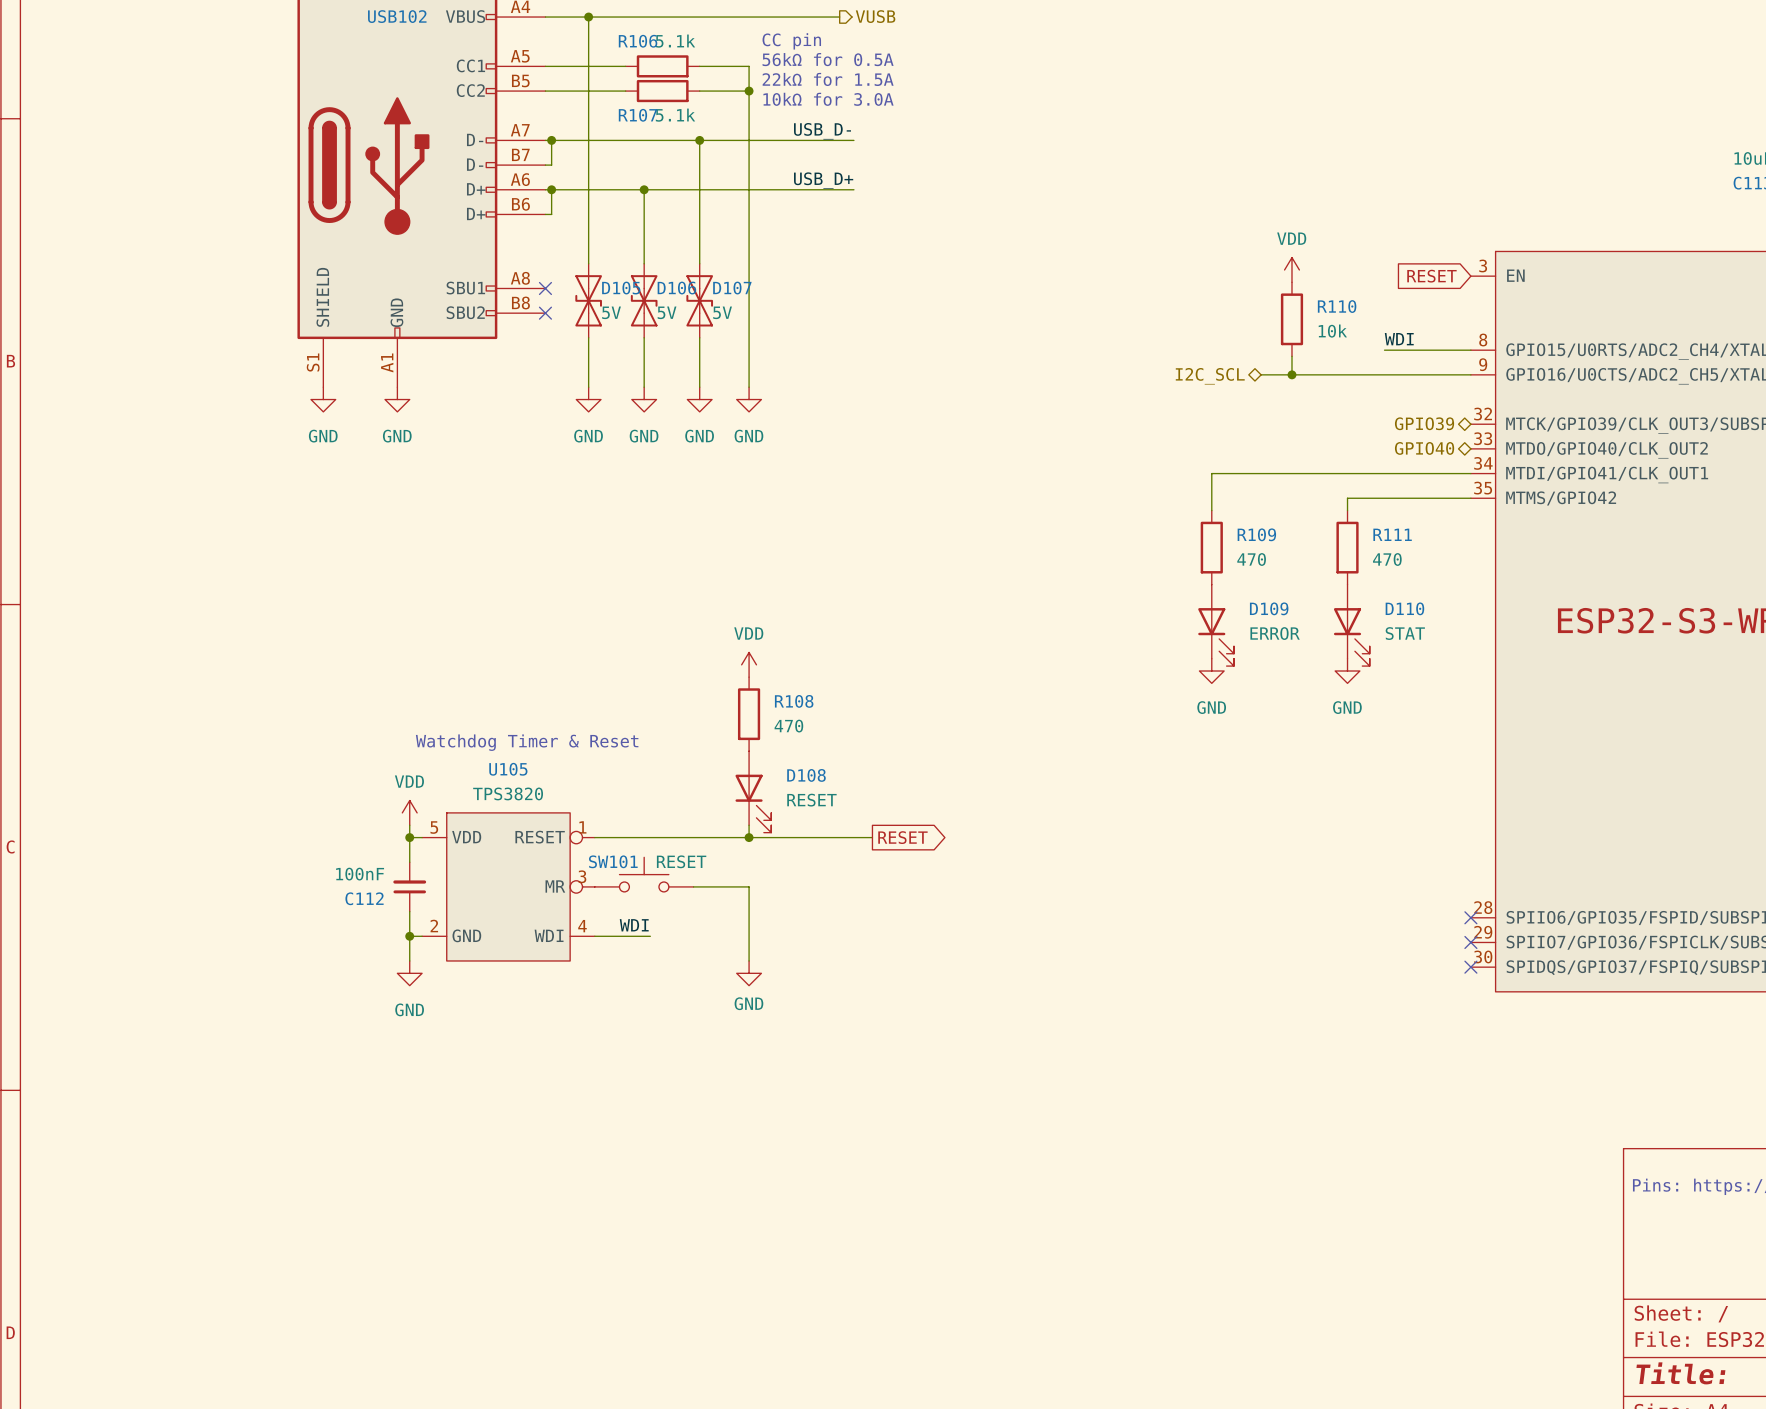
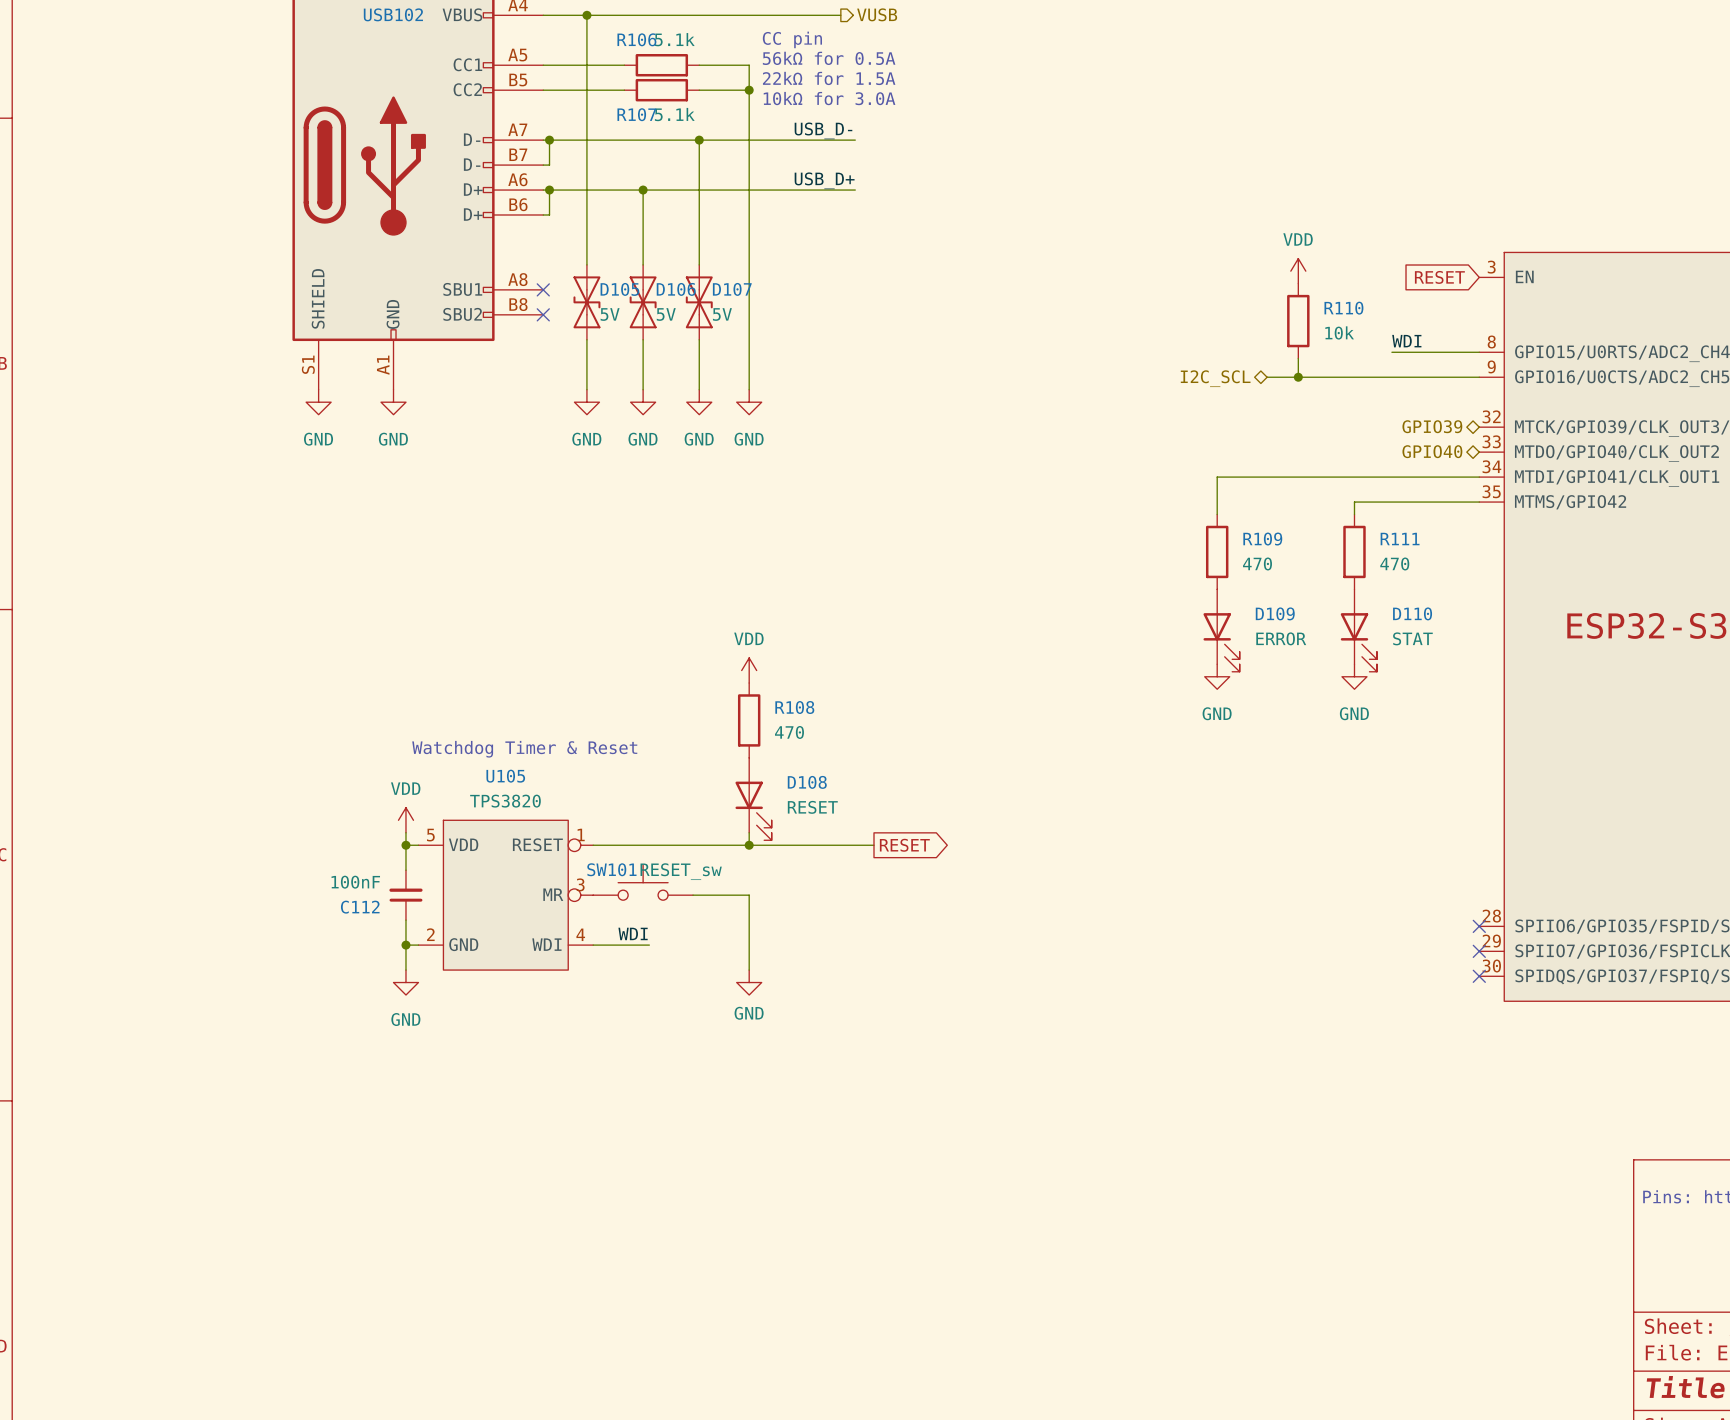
SW101 value: RESET (681, 861) -> RESET_sw (681, 871)

